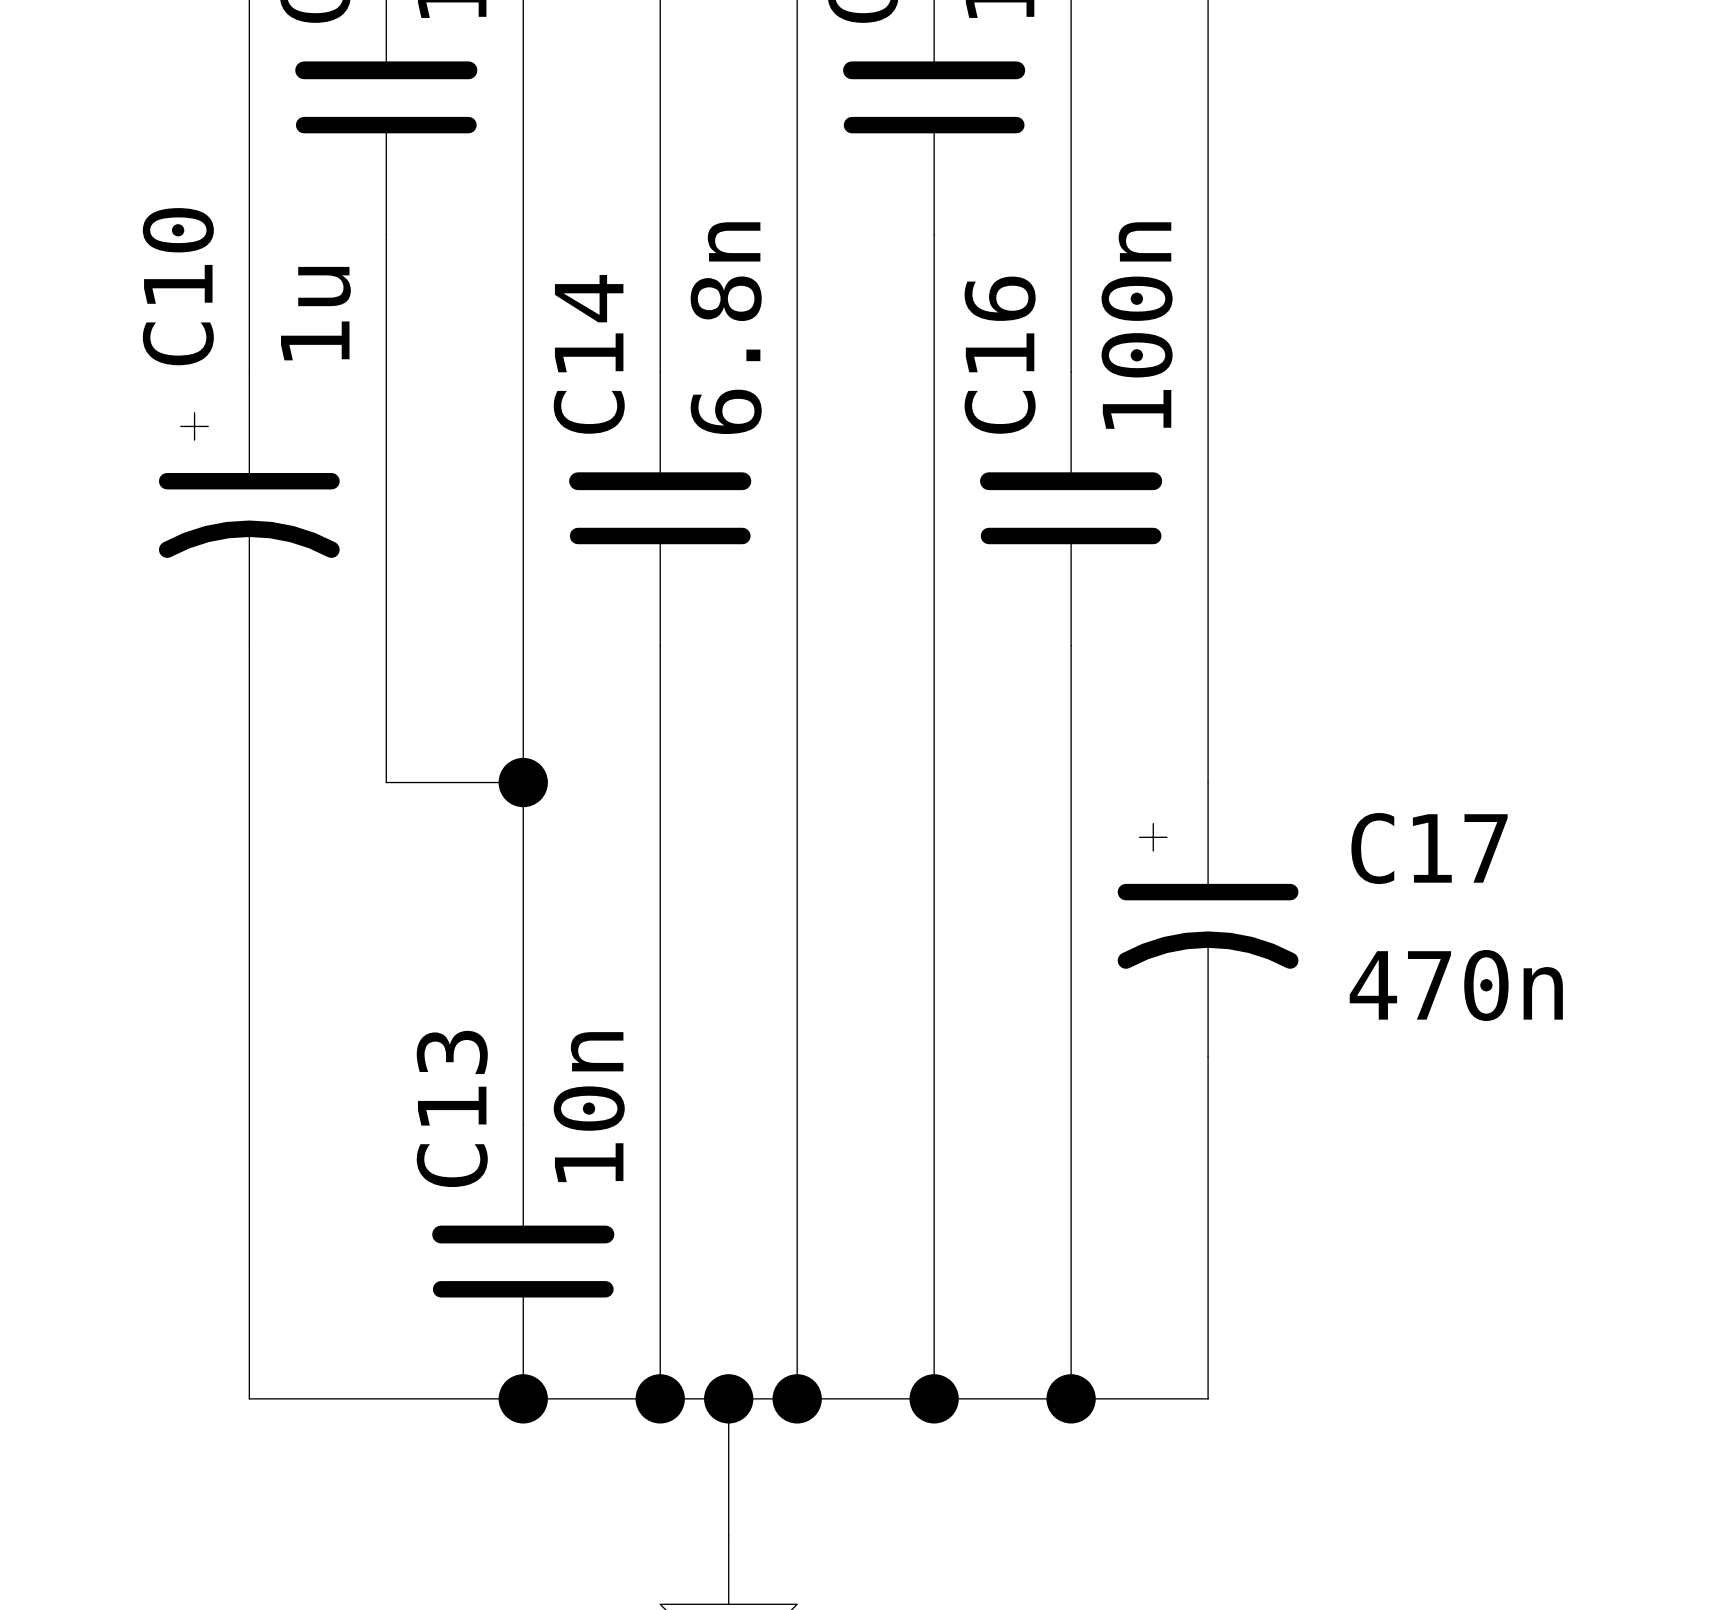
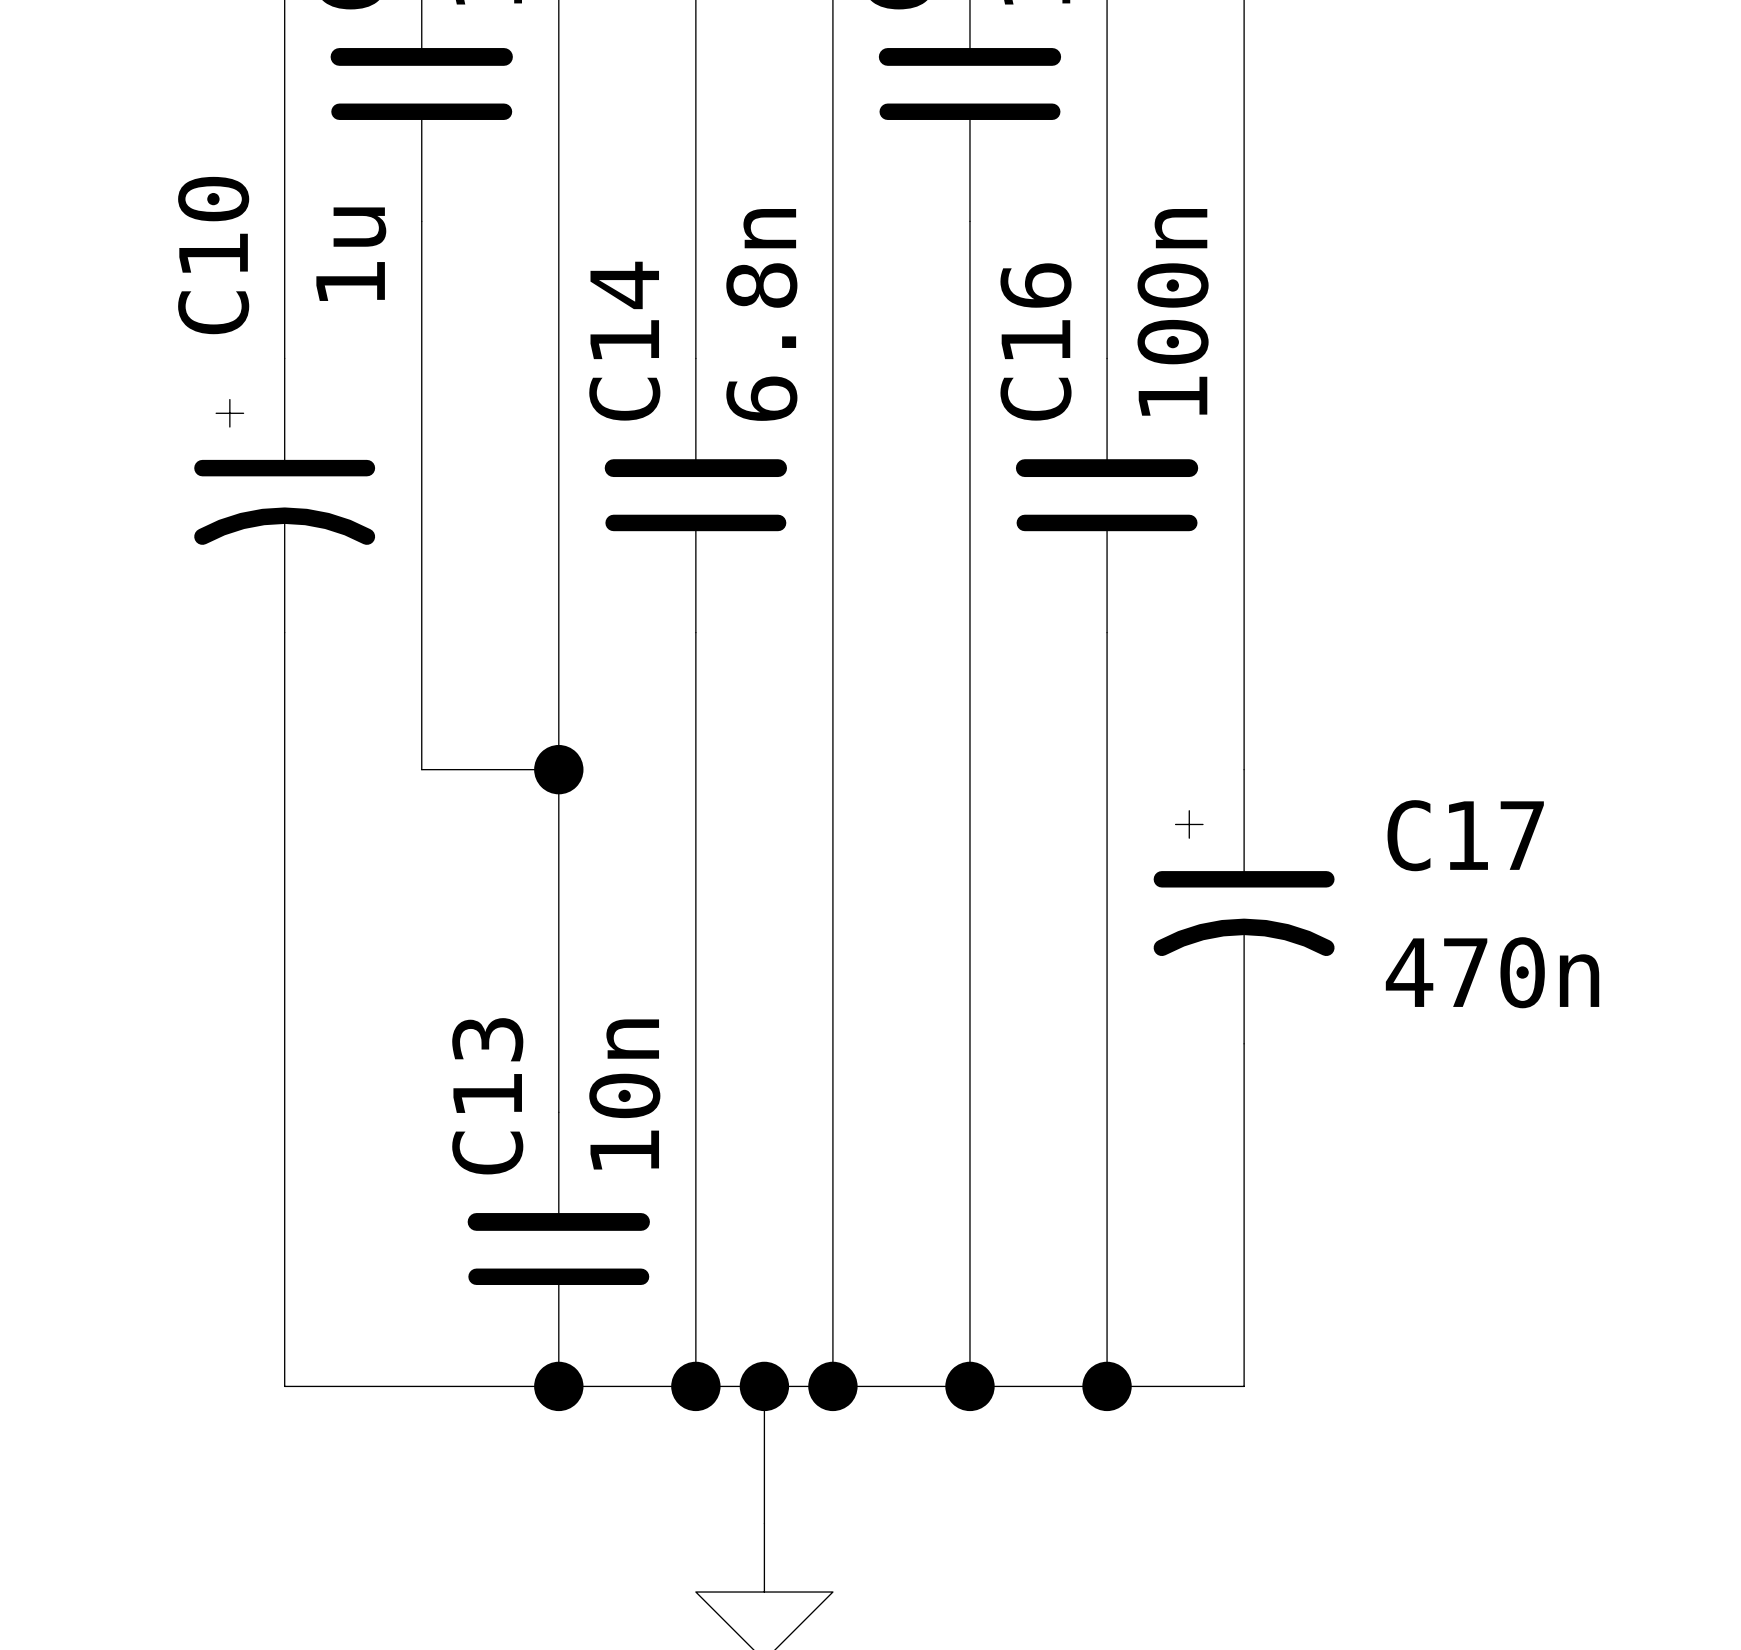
C10 name position: C10 (178, 286) -> C10 (213, 255)
C10 value position: 1u (315, 313) -> 1u (351, 254)

